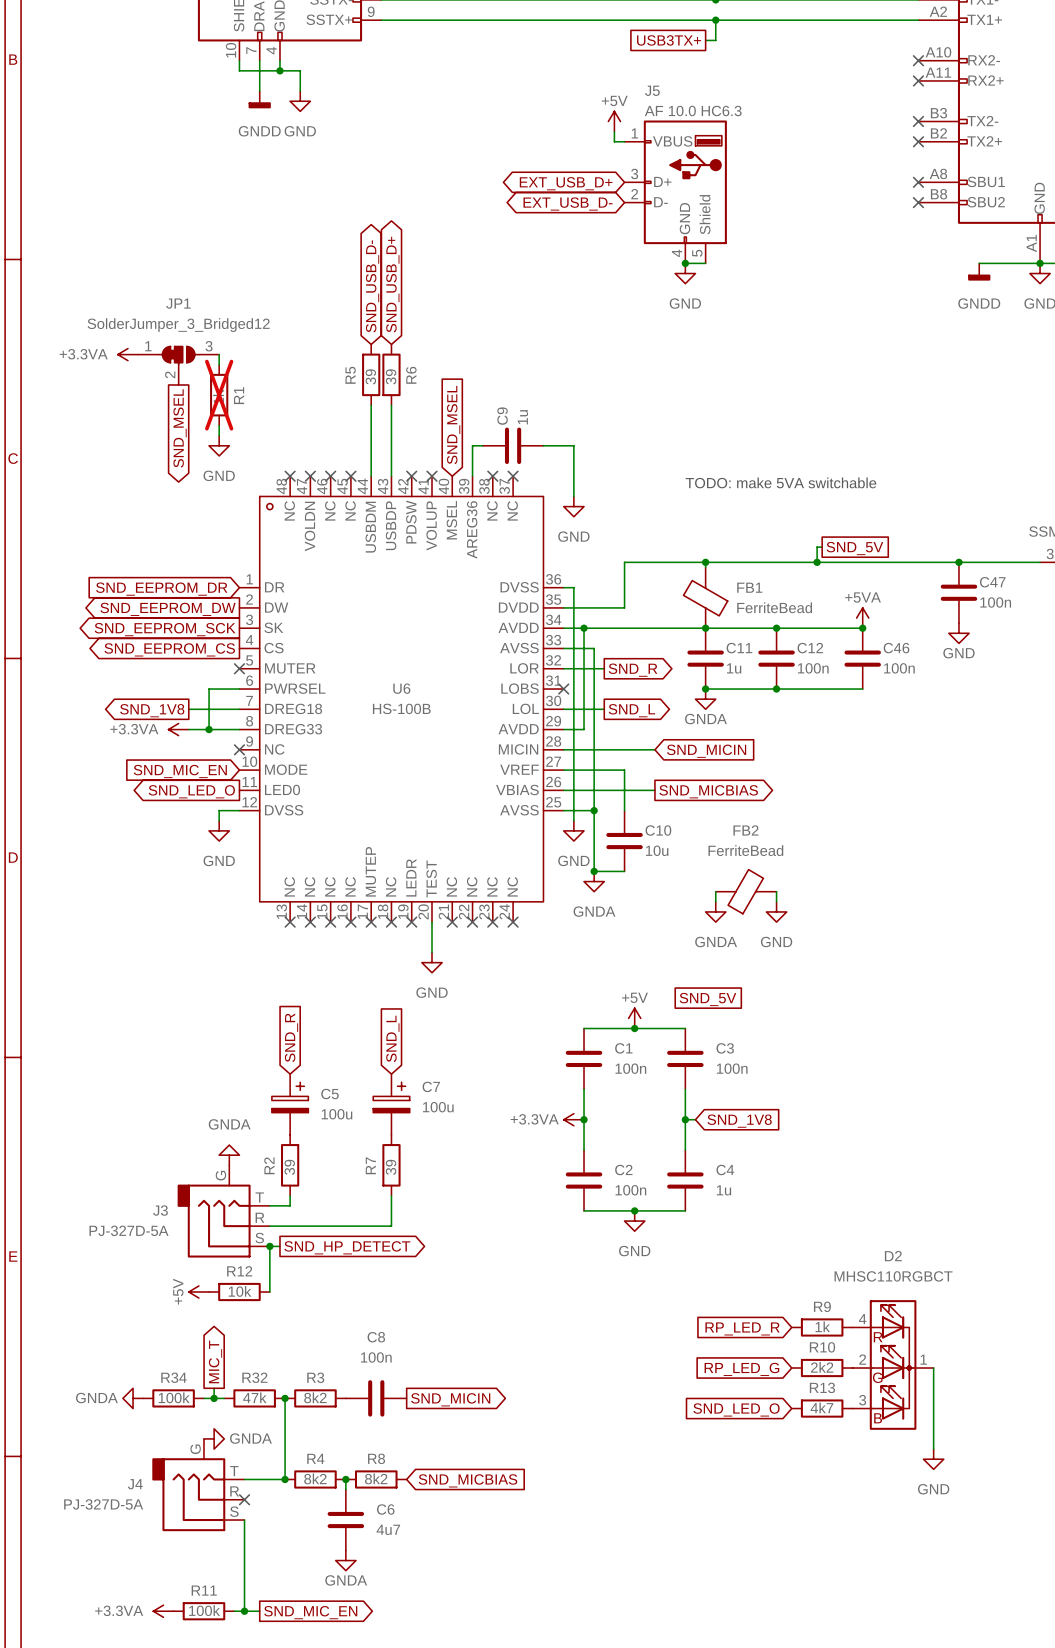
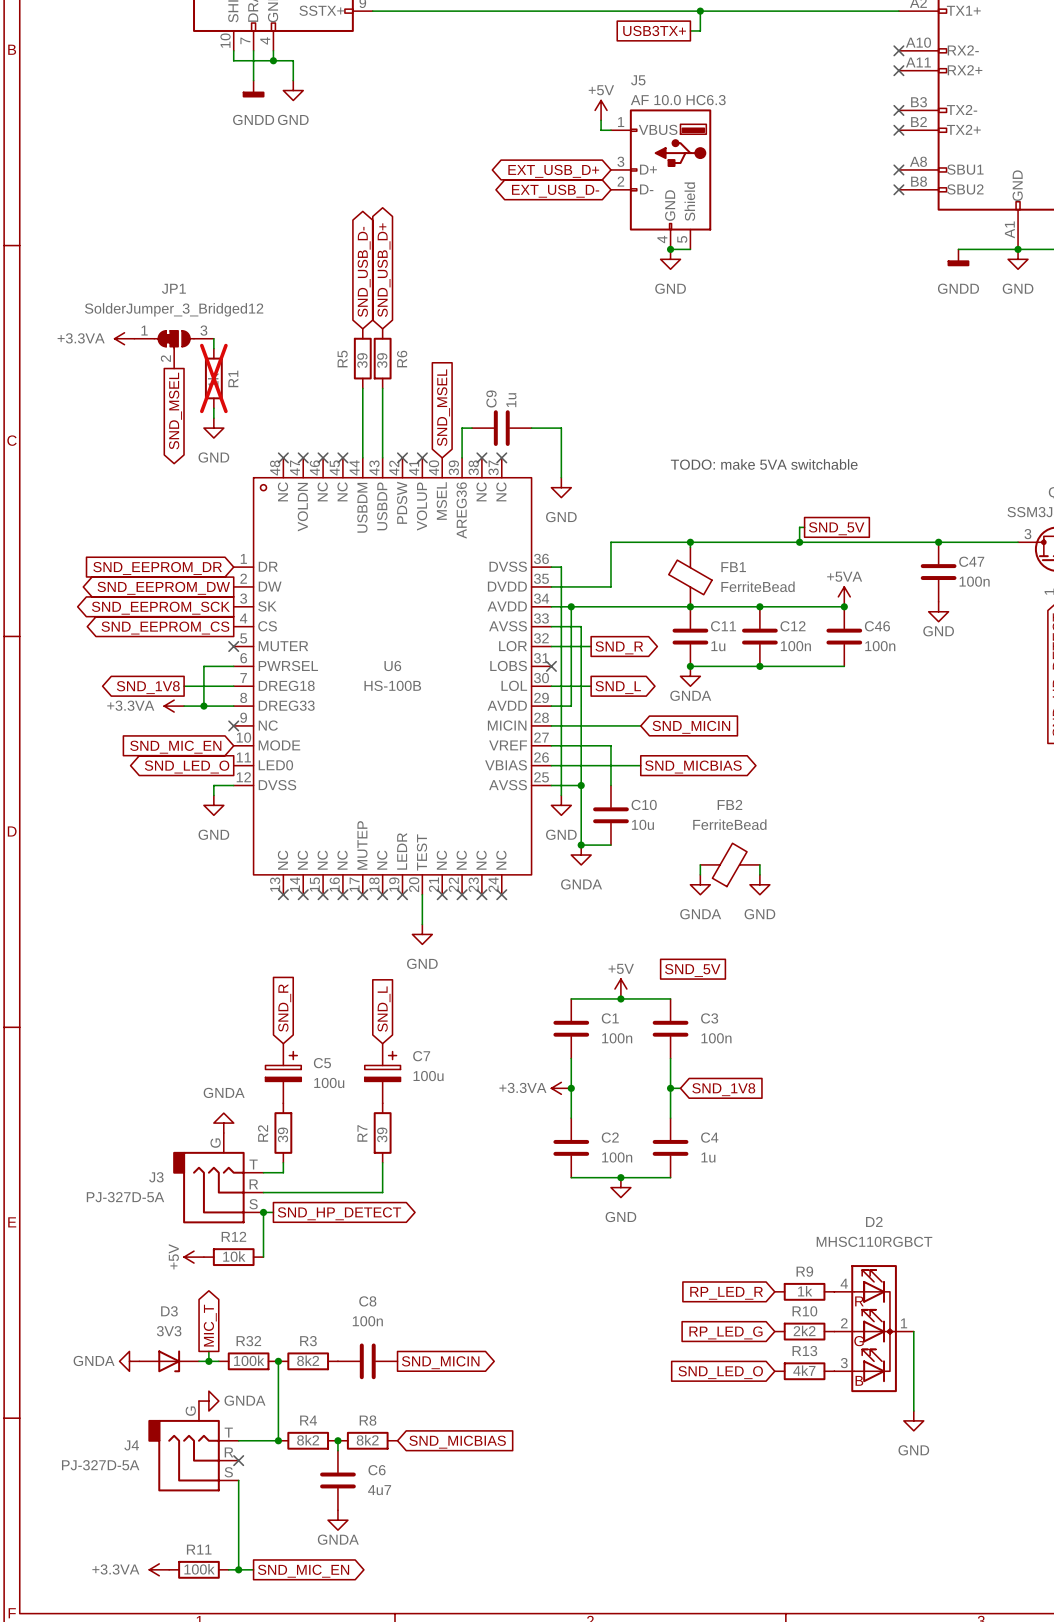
R32 value: 47k (254, 1397) -> 100k (249, 1360)
R34: 100k (173, 1398) -> none
D3: none -> 3V3 (169, 1361)

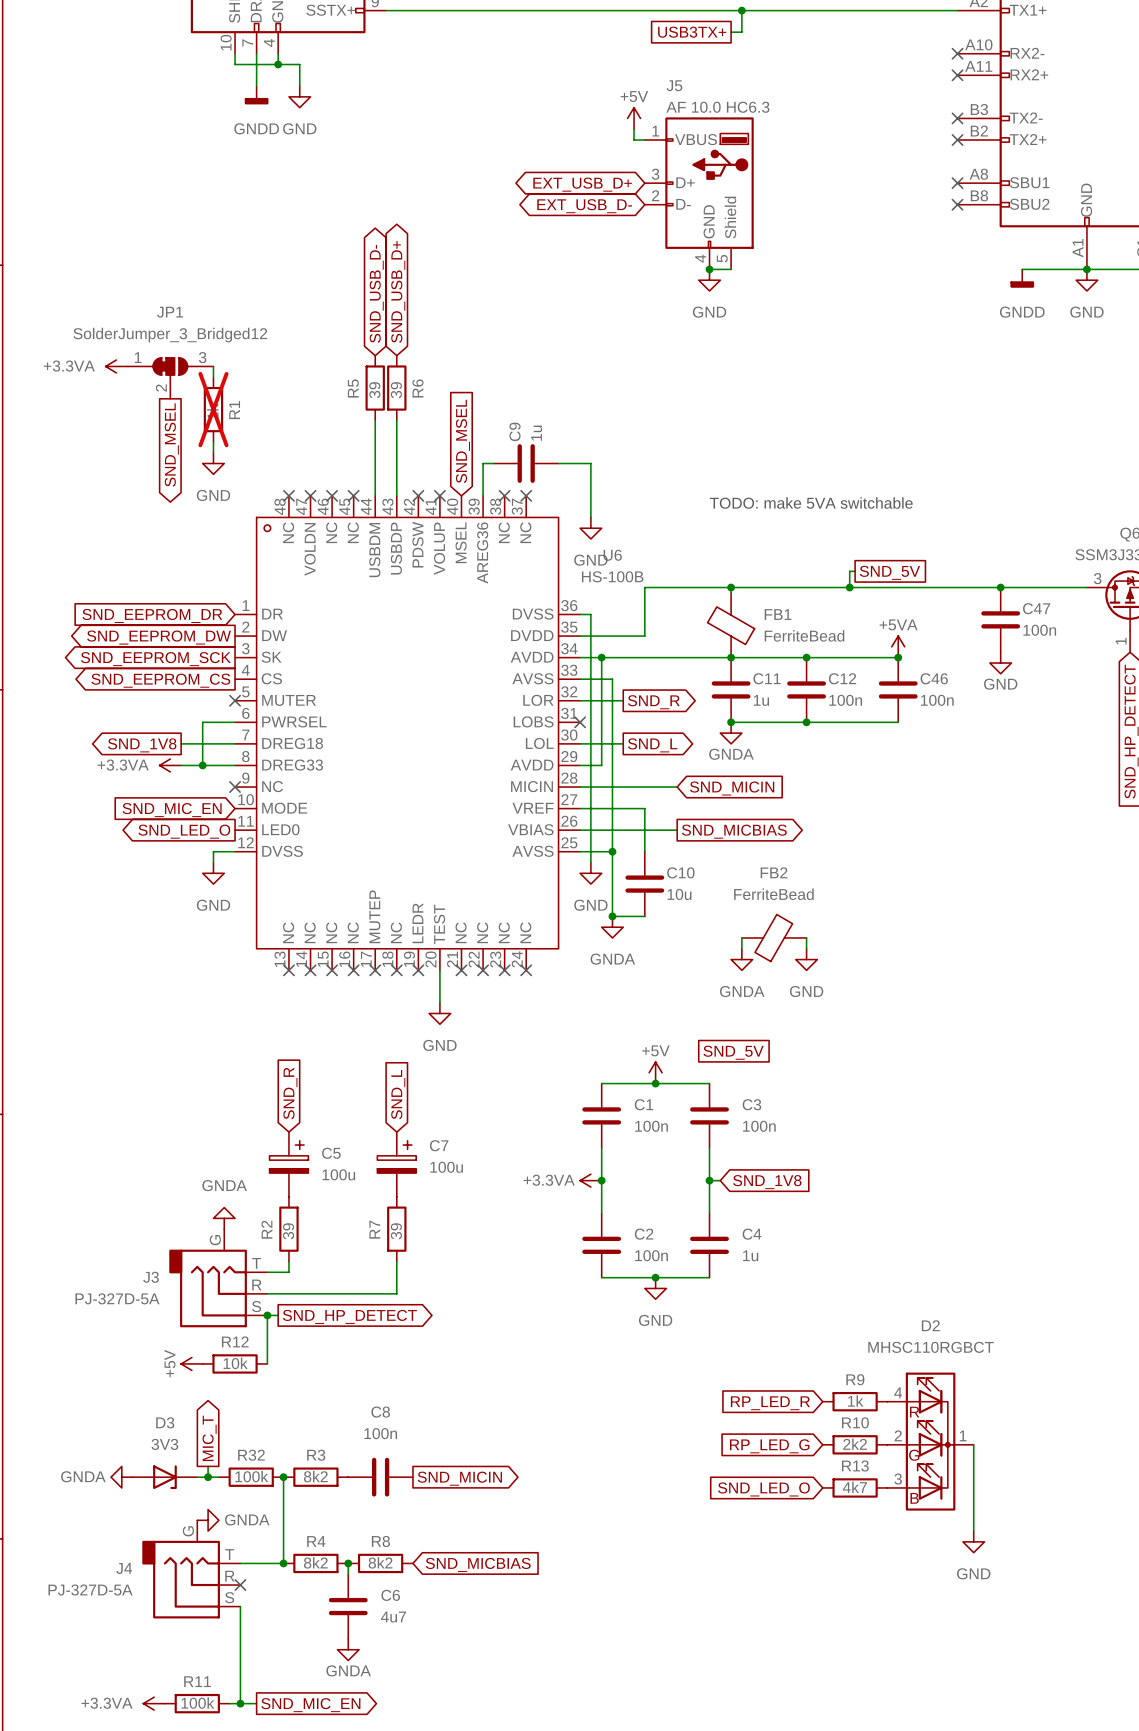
U6 name position: U6 (392, 666) -> U6 (612, 555)
U6 value position: HS-100B (392, 685) -> HS-100B (612, 576)

